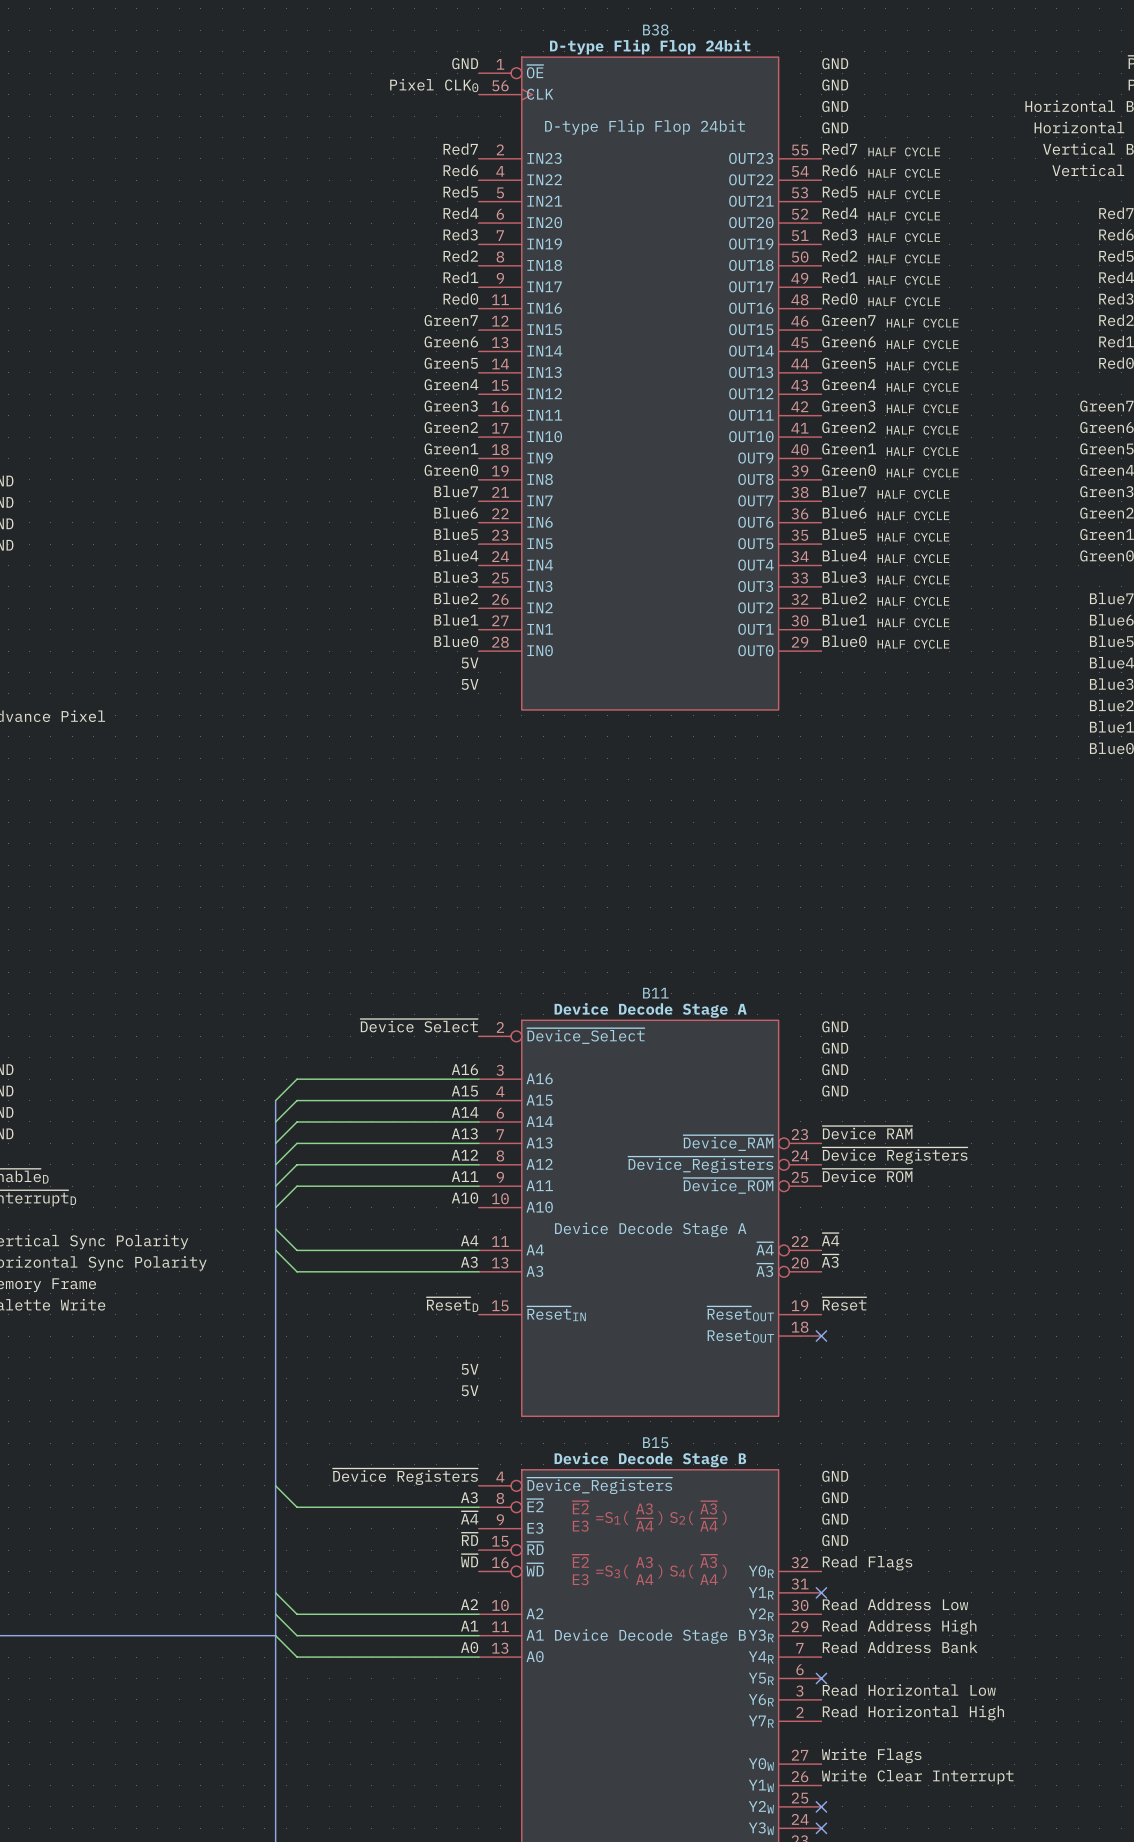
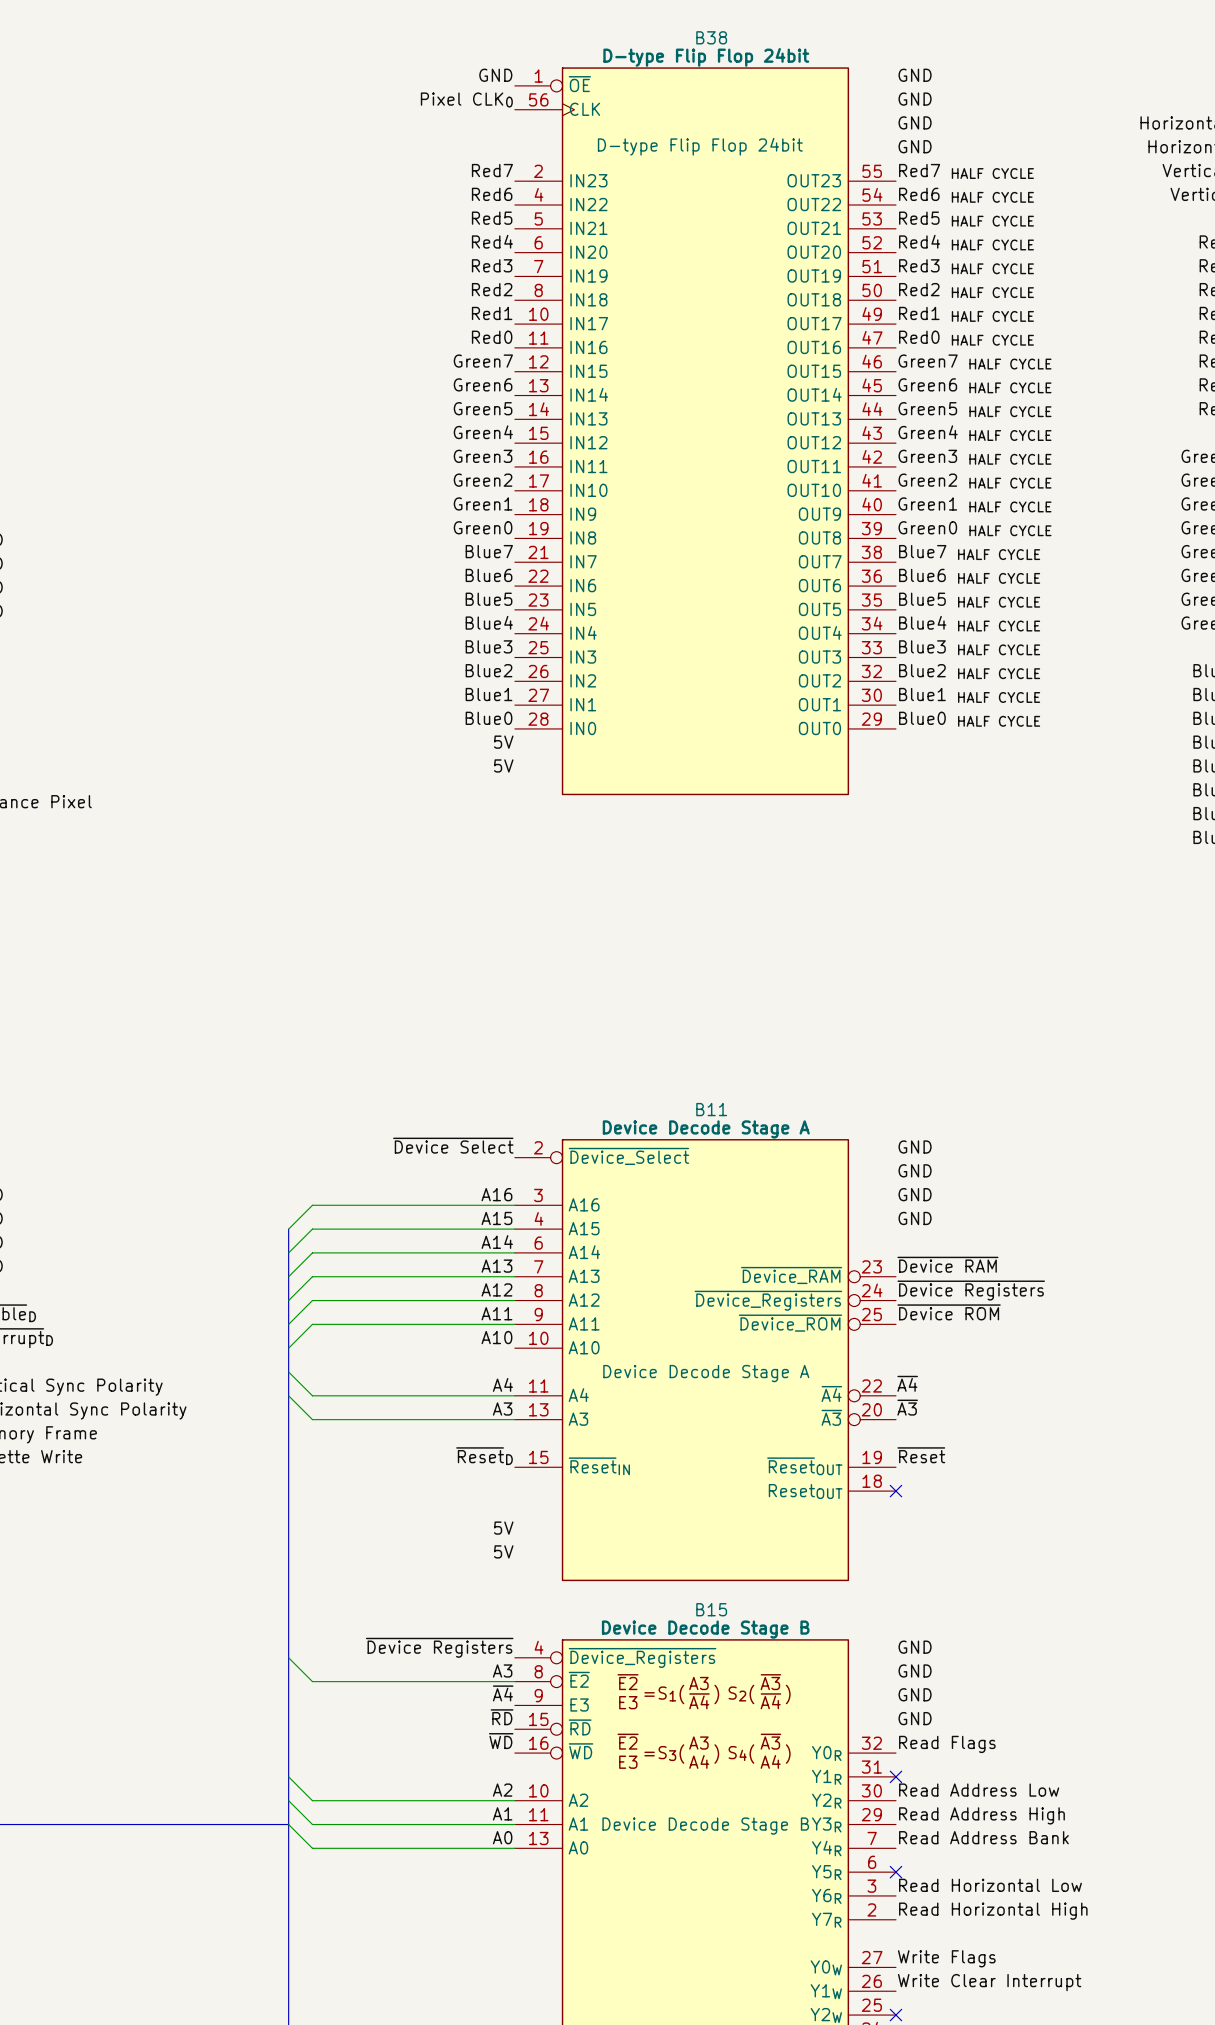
B38 pin number: 9 (500, 278) -> 10 (538, 314)
B38 pin number: 48 (799, 299) -> 47 (872, 337)

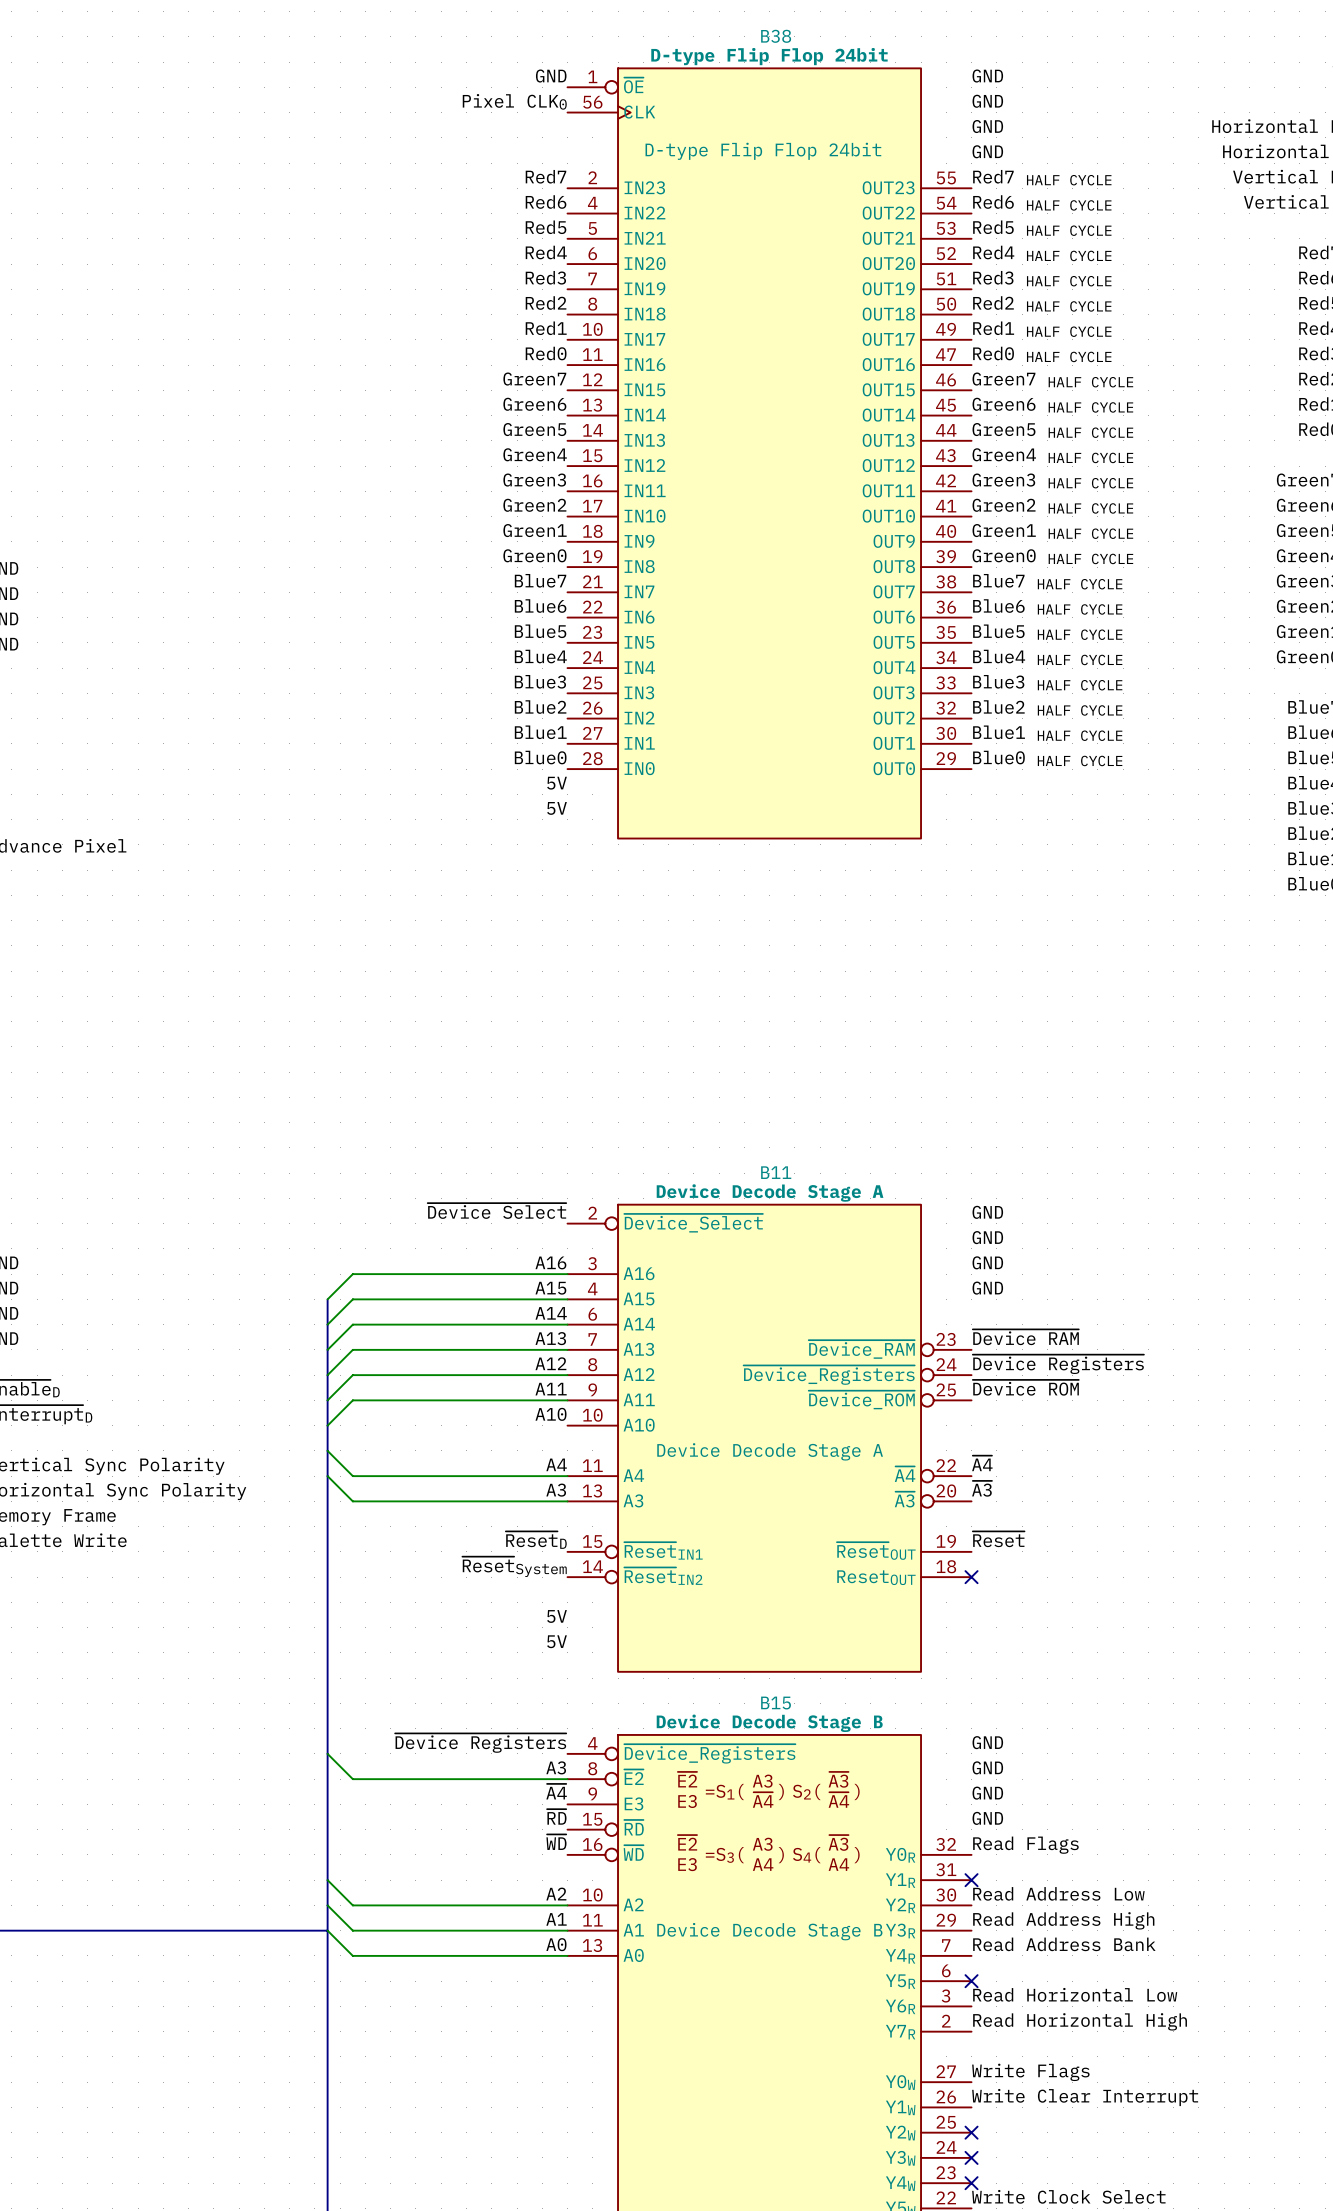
B11 symbol: [514, 1139, 896, 1582] -> [567, 1203, 972, 1673]
label: none -> ~{Reset}System (514, 1566)

